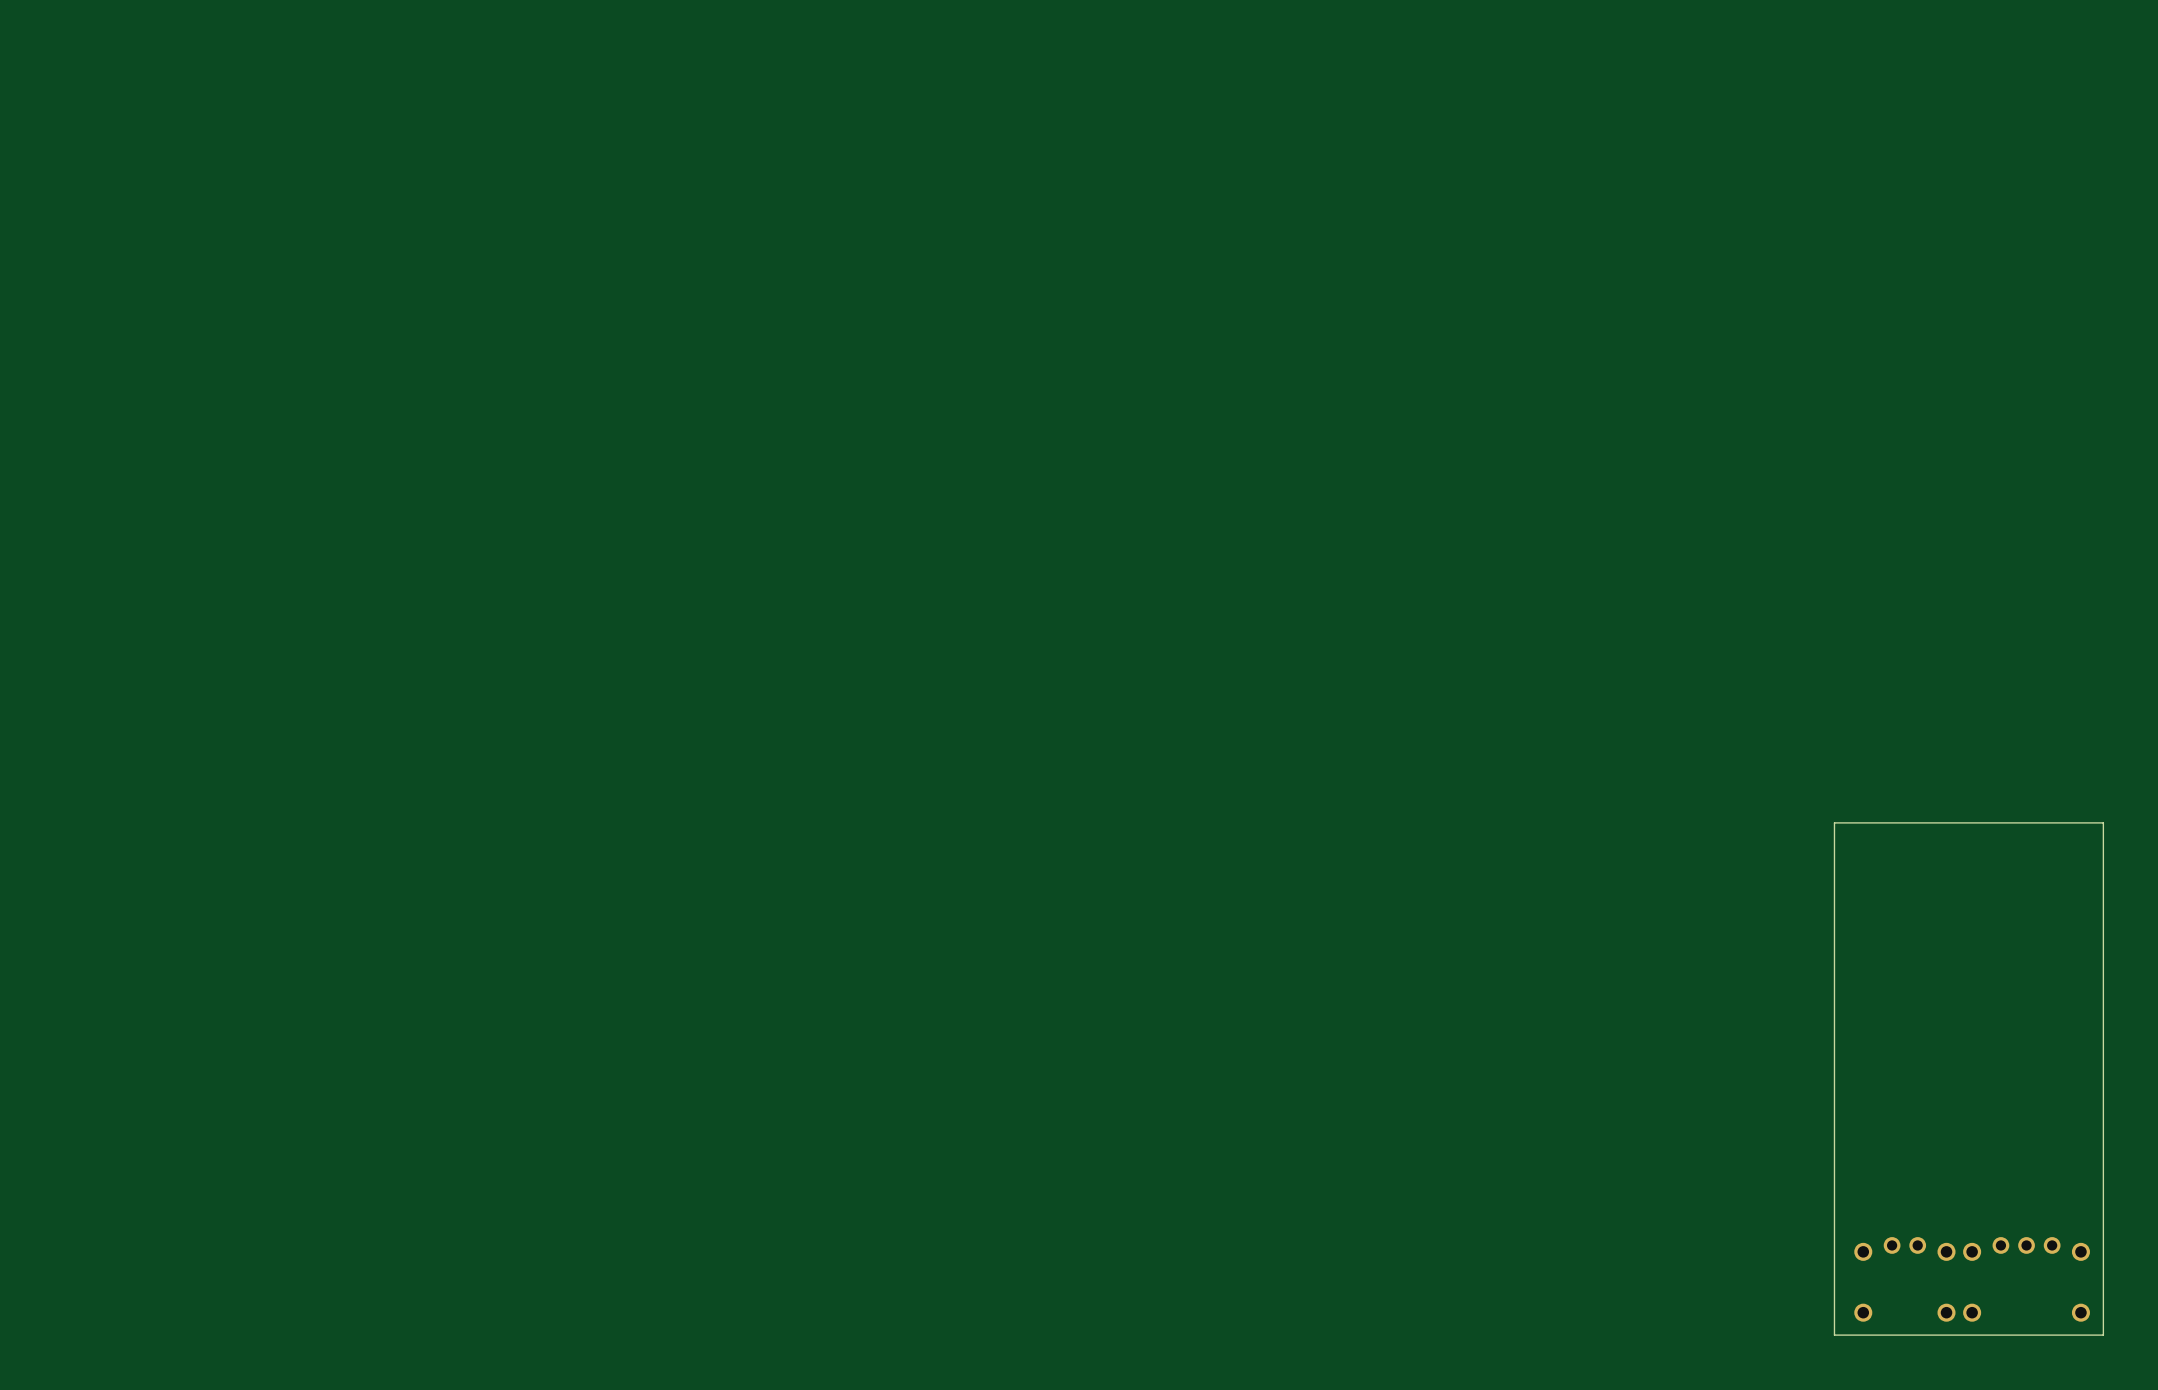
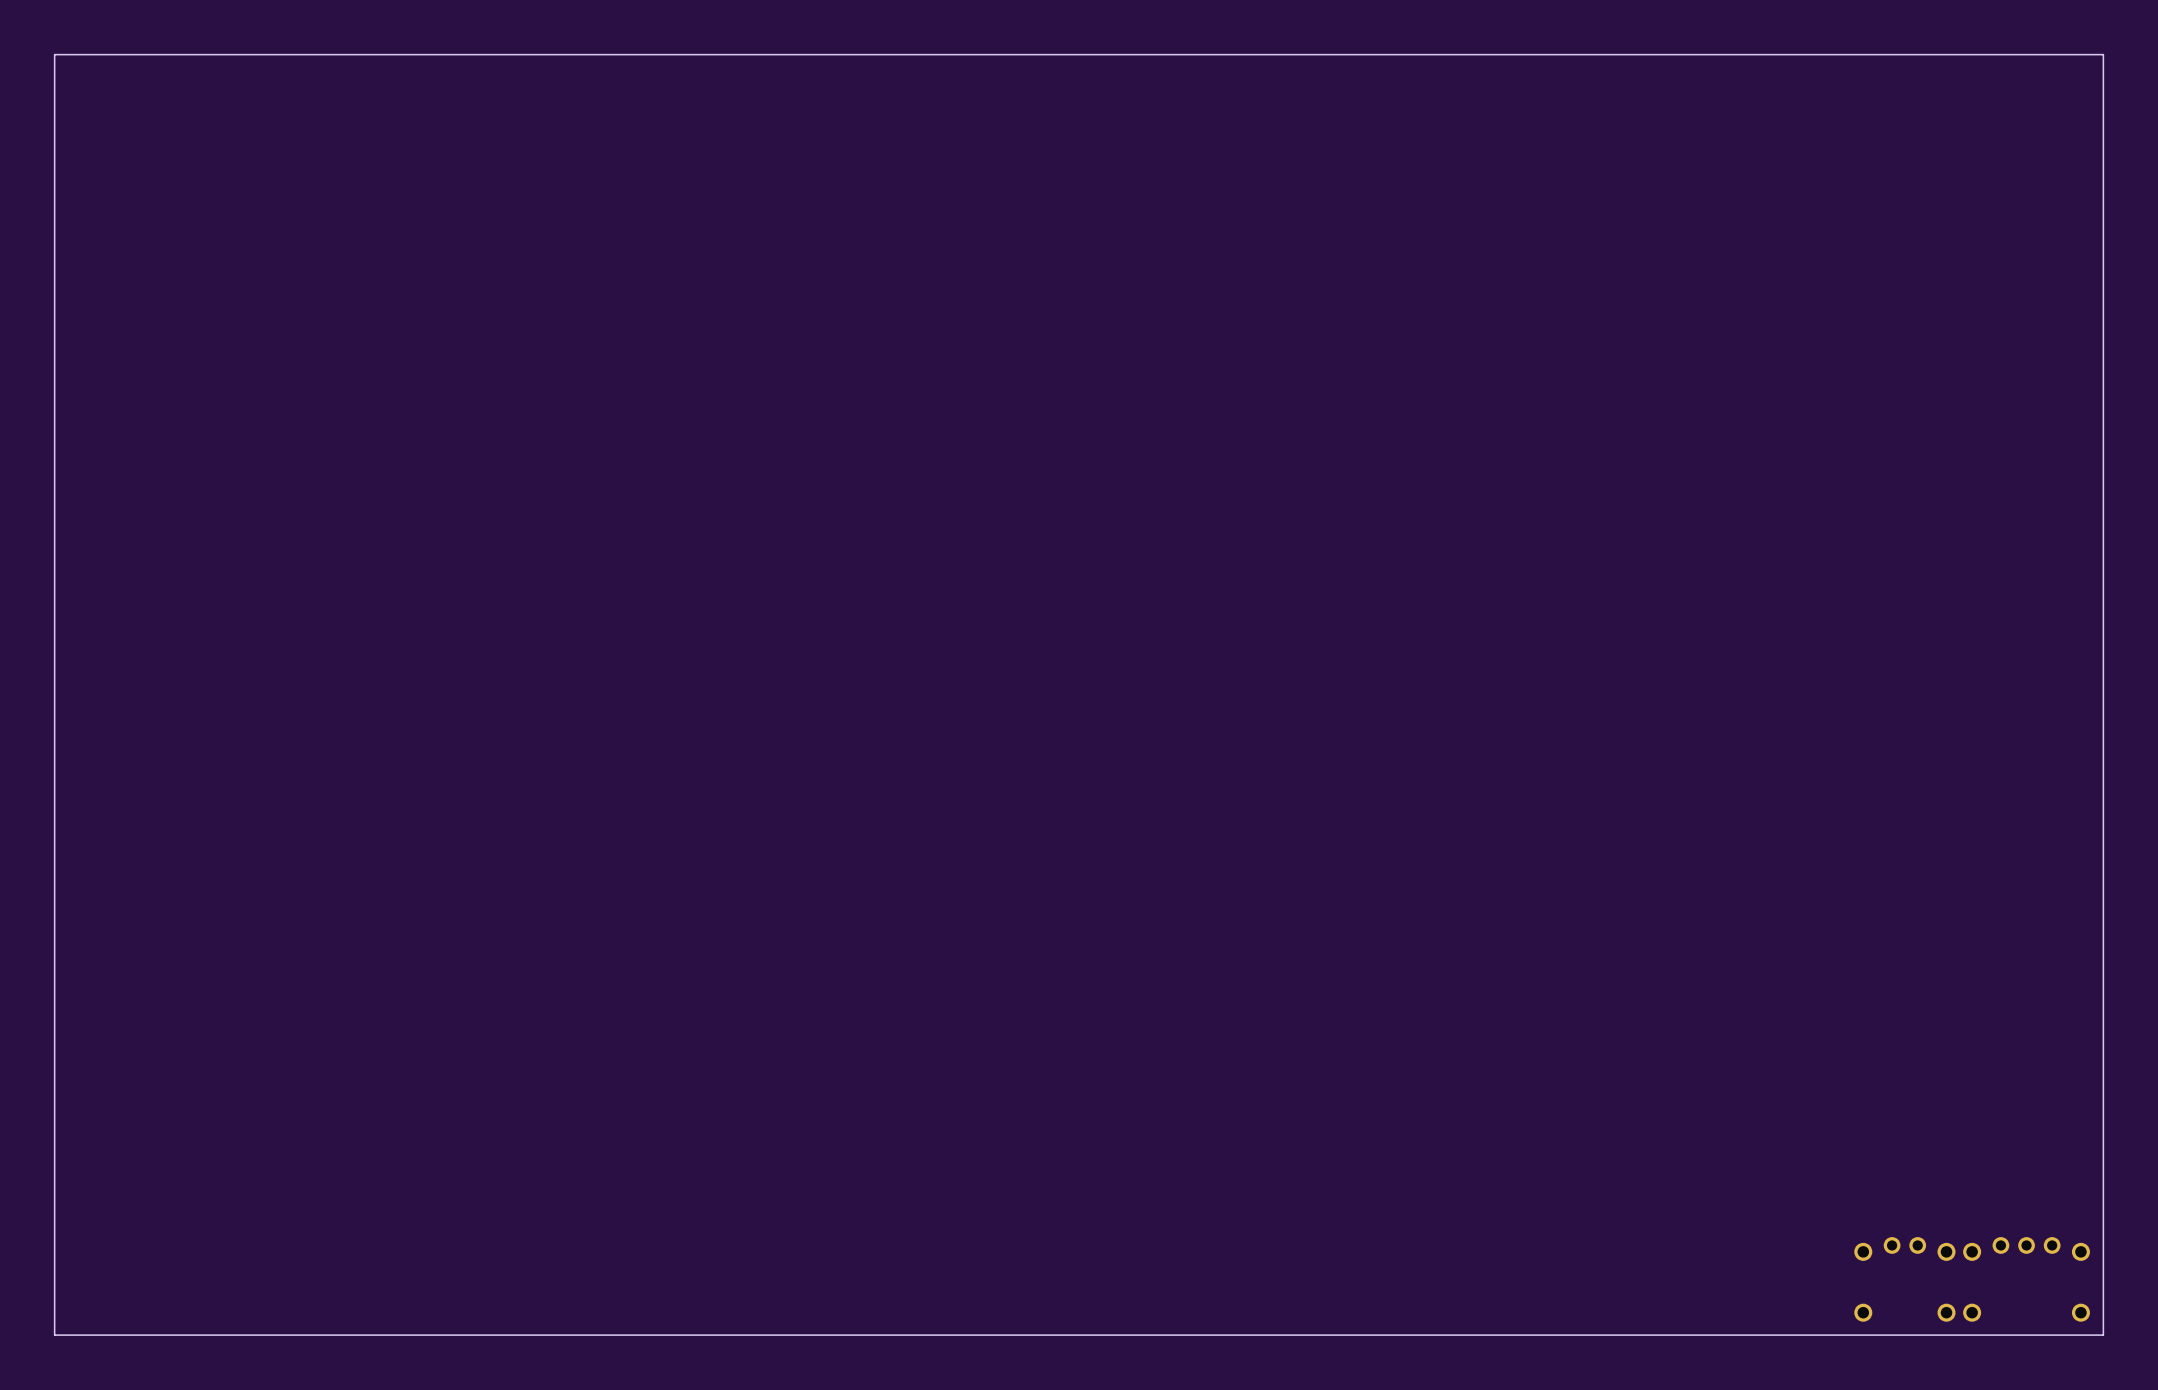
board edge: (2103, 822) (1834, 822) (1834, 1335) -> (2103, 822) (2103, 54) (54, 54) (54, 1335) (1834, 1335)

